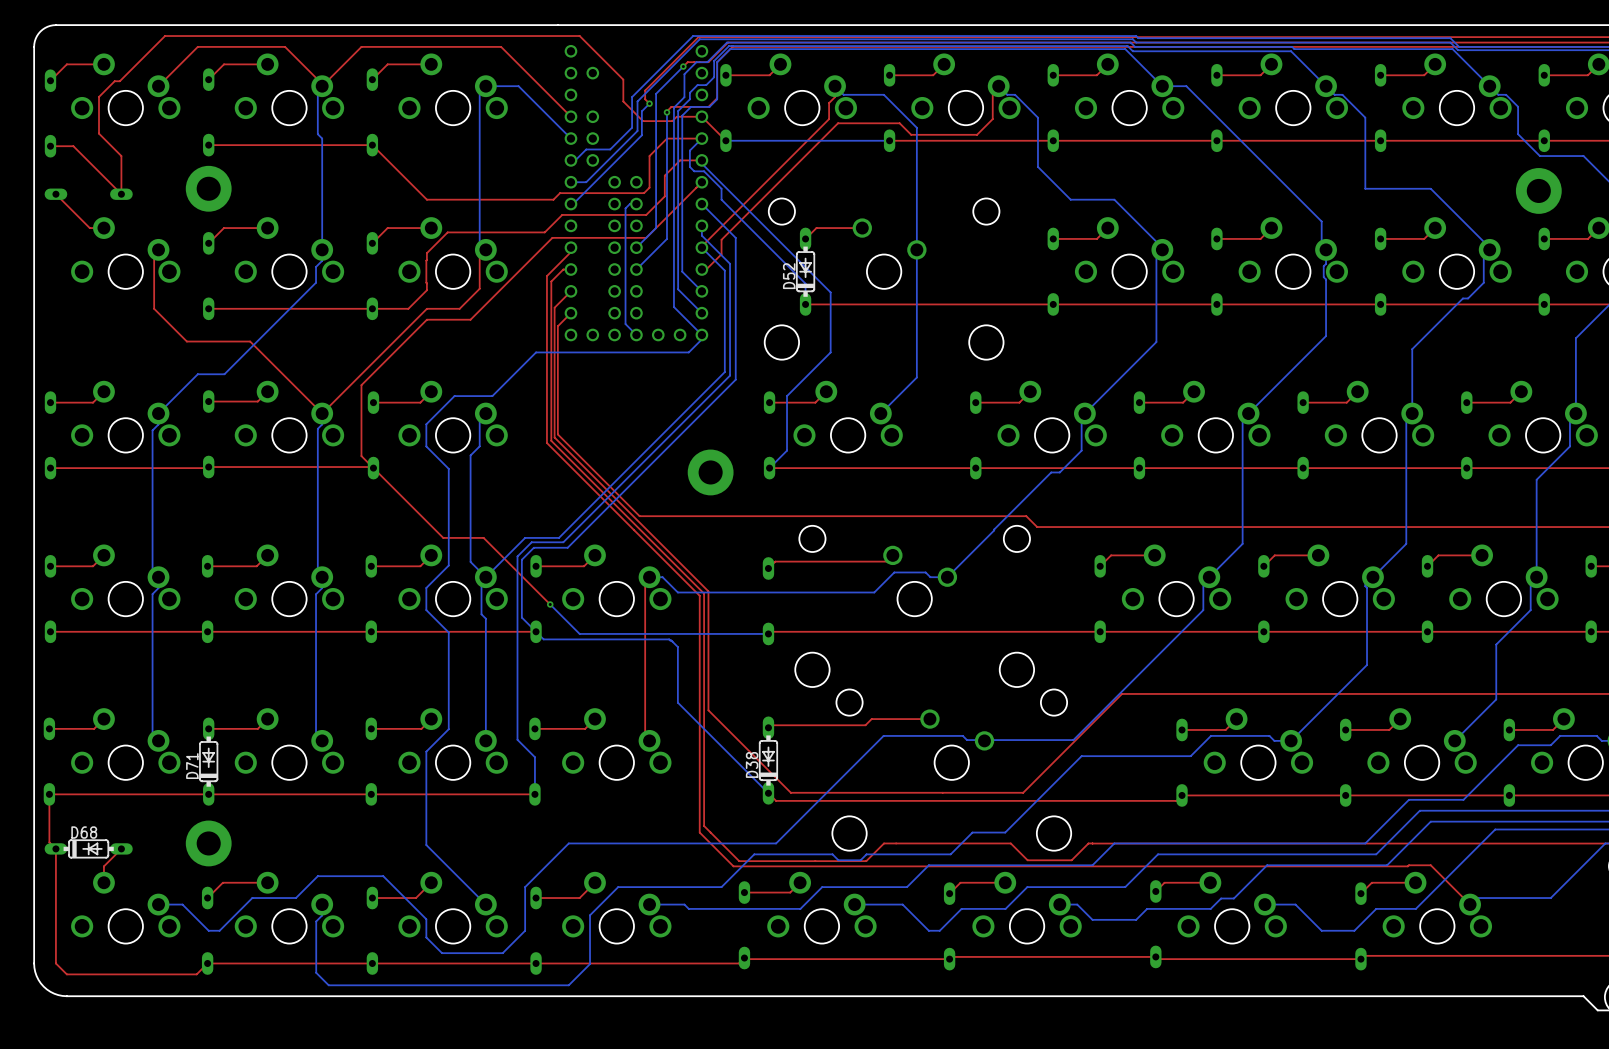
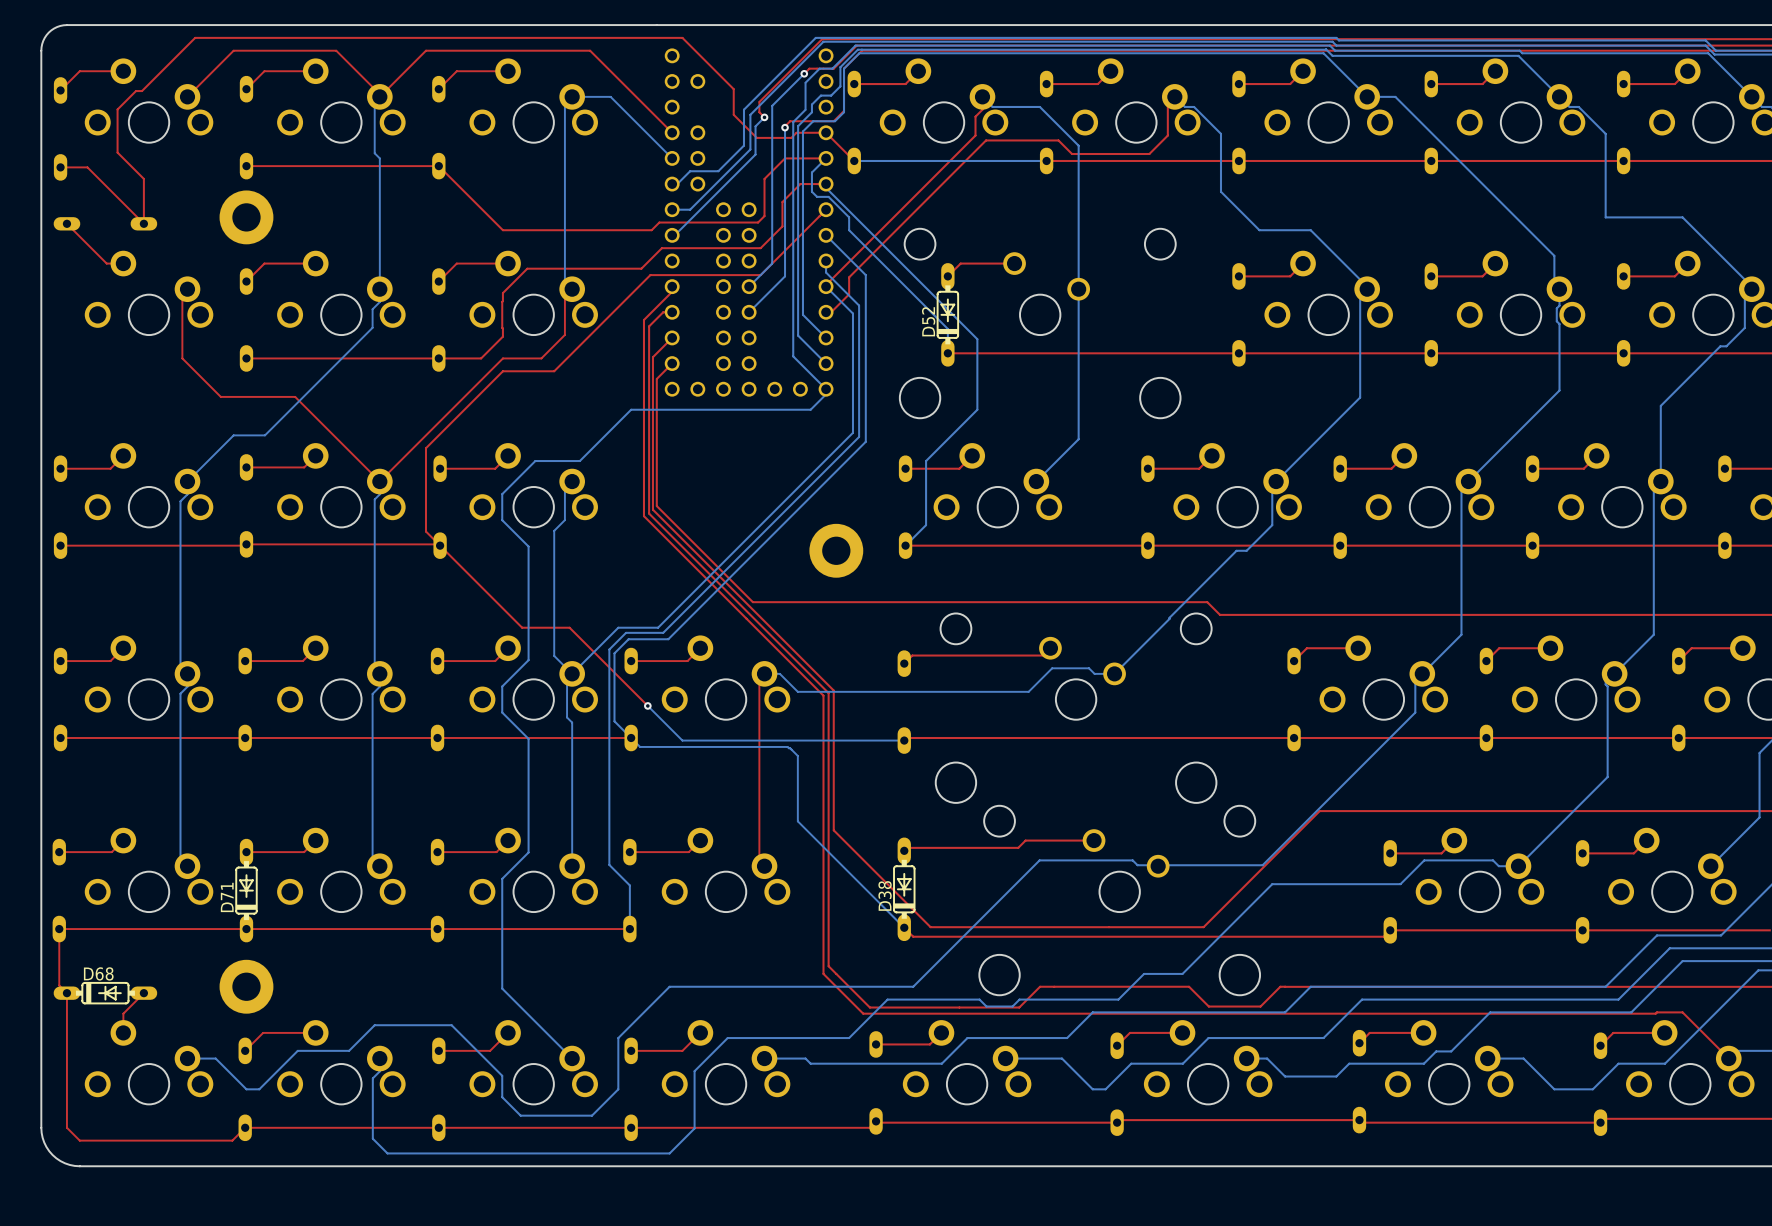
bottom track: (636, 204) (629, 204) (625, 208) (625, 324) (636, 334) -> none

